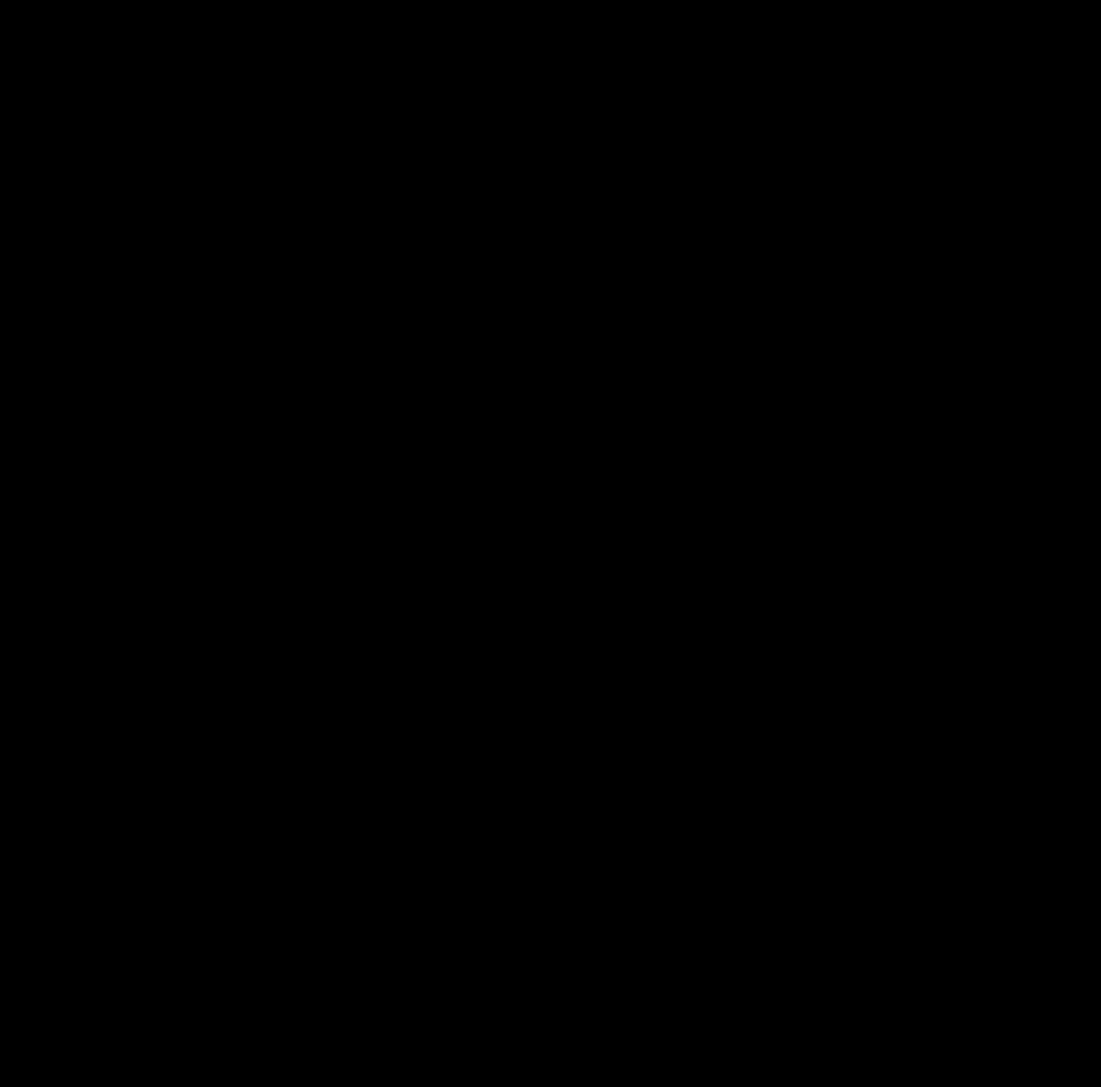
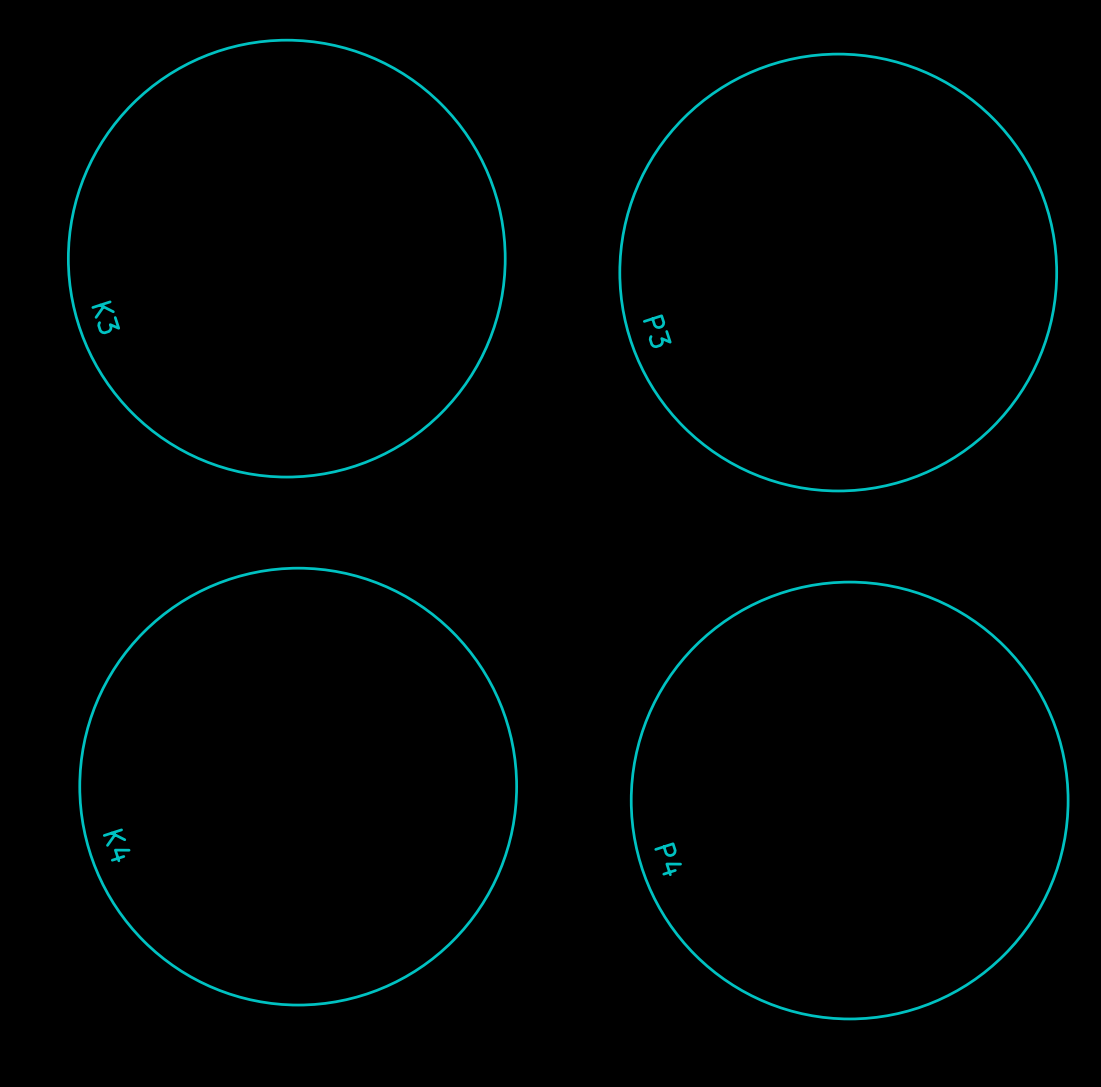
drawing: none -> [66, 38, 507, 479]
drawing: none -> [618, 52, 1059, 493]
text: none -> K3 (105, 317)
text: none -> P3 (657, 331)
drawing: none -> [78, 566, 518, 1007]
drawing: none -> [629, 580, 1070, 1021]
text: none -> K4 (116, 845)
text: none -> P4 (668, 859)

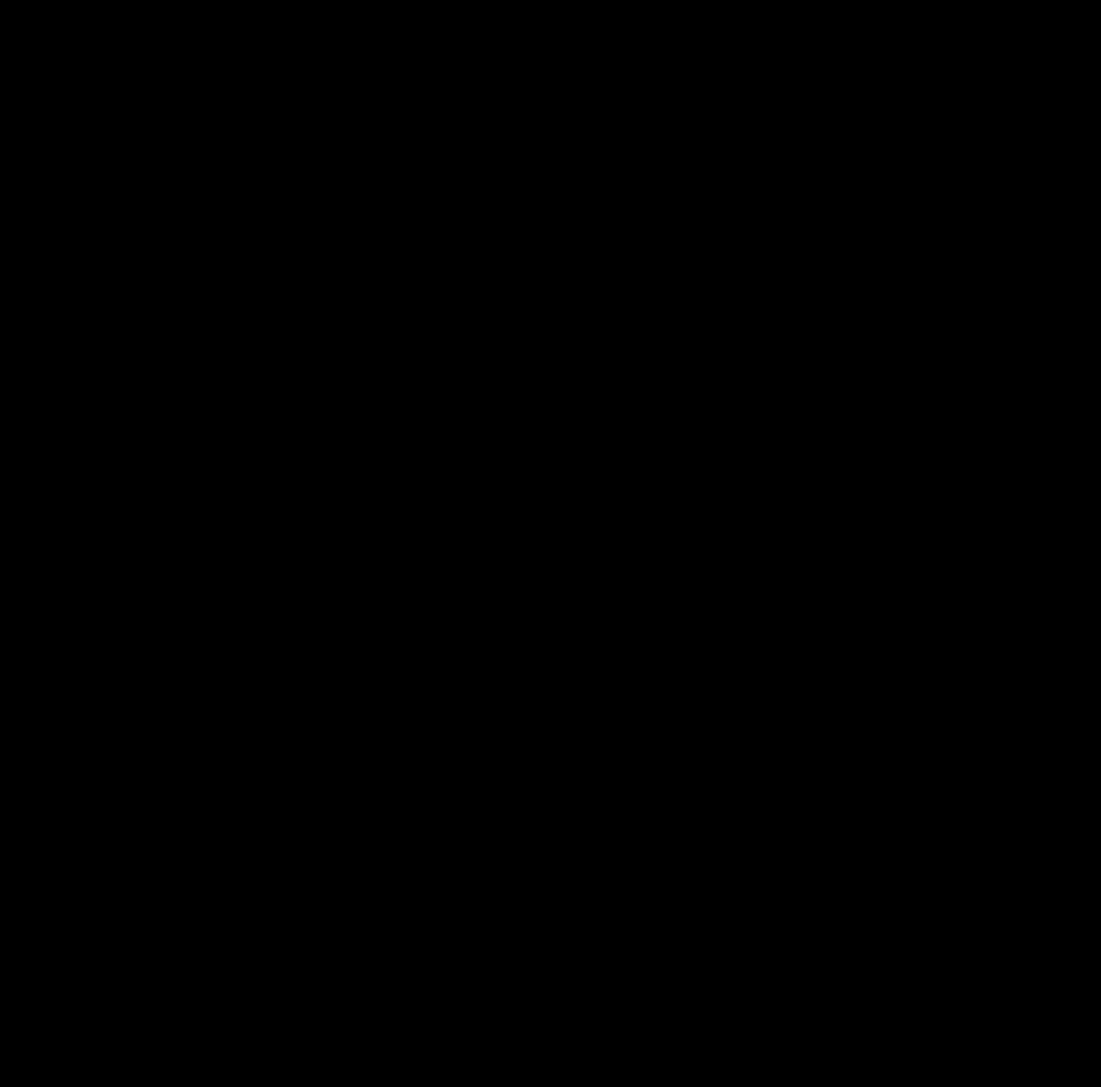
drawing: [66, 38, 507, 479] -> none
drawing: [618, 52, 1059, 493] -> none
text: K3 (105, 317) -> none
text: P3 (657, 331) -> none
drawing: [78, 566, 518, 1007] -> none
drawing: [629, 580, 1070, 1021] -> none
text: K4 (116, 845) -> none
text: P4 (668, 859) -> none

